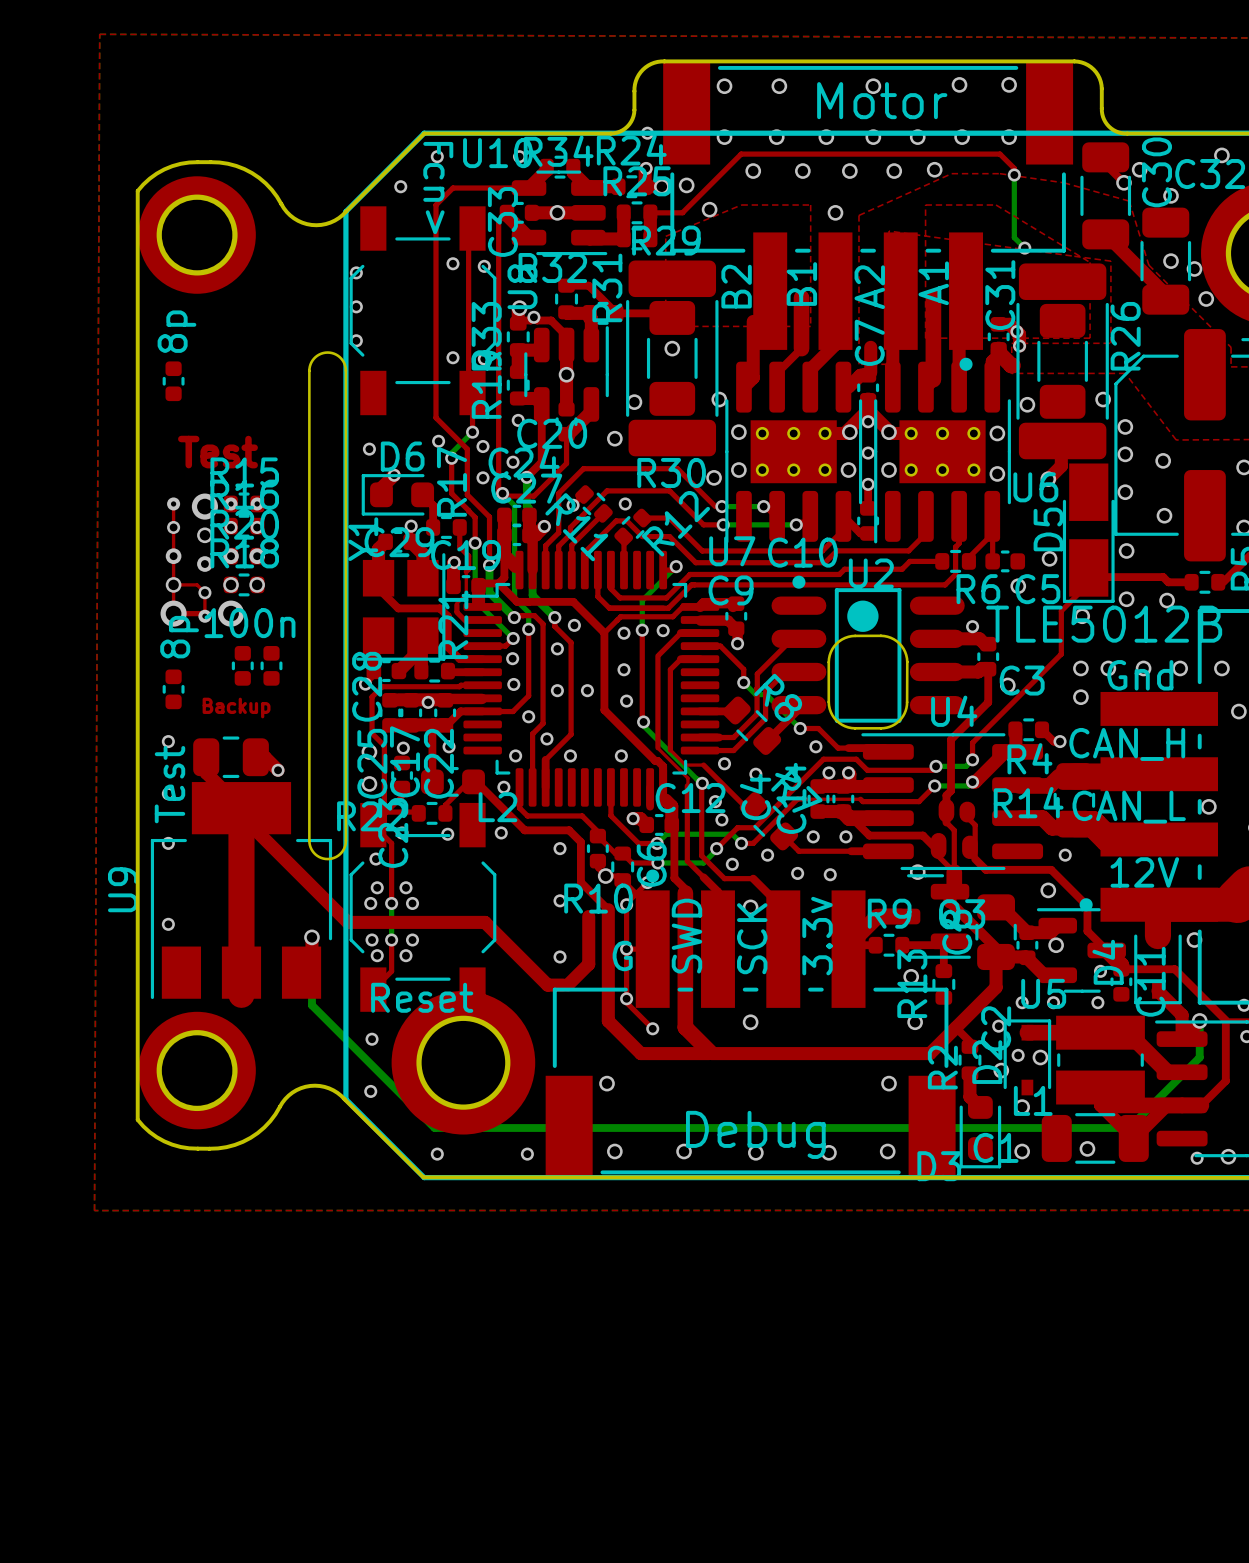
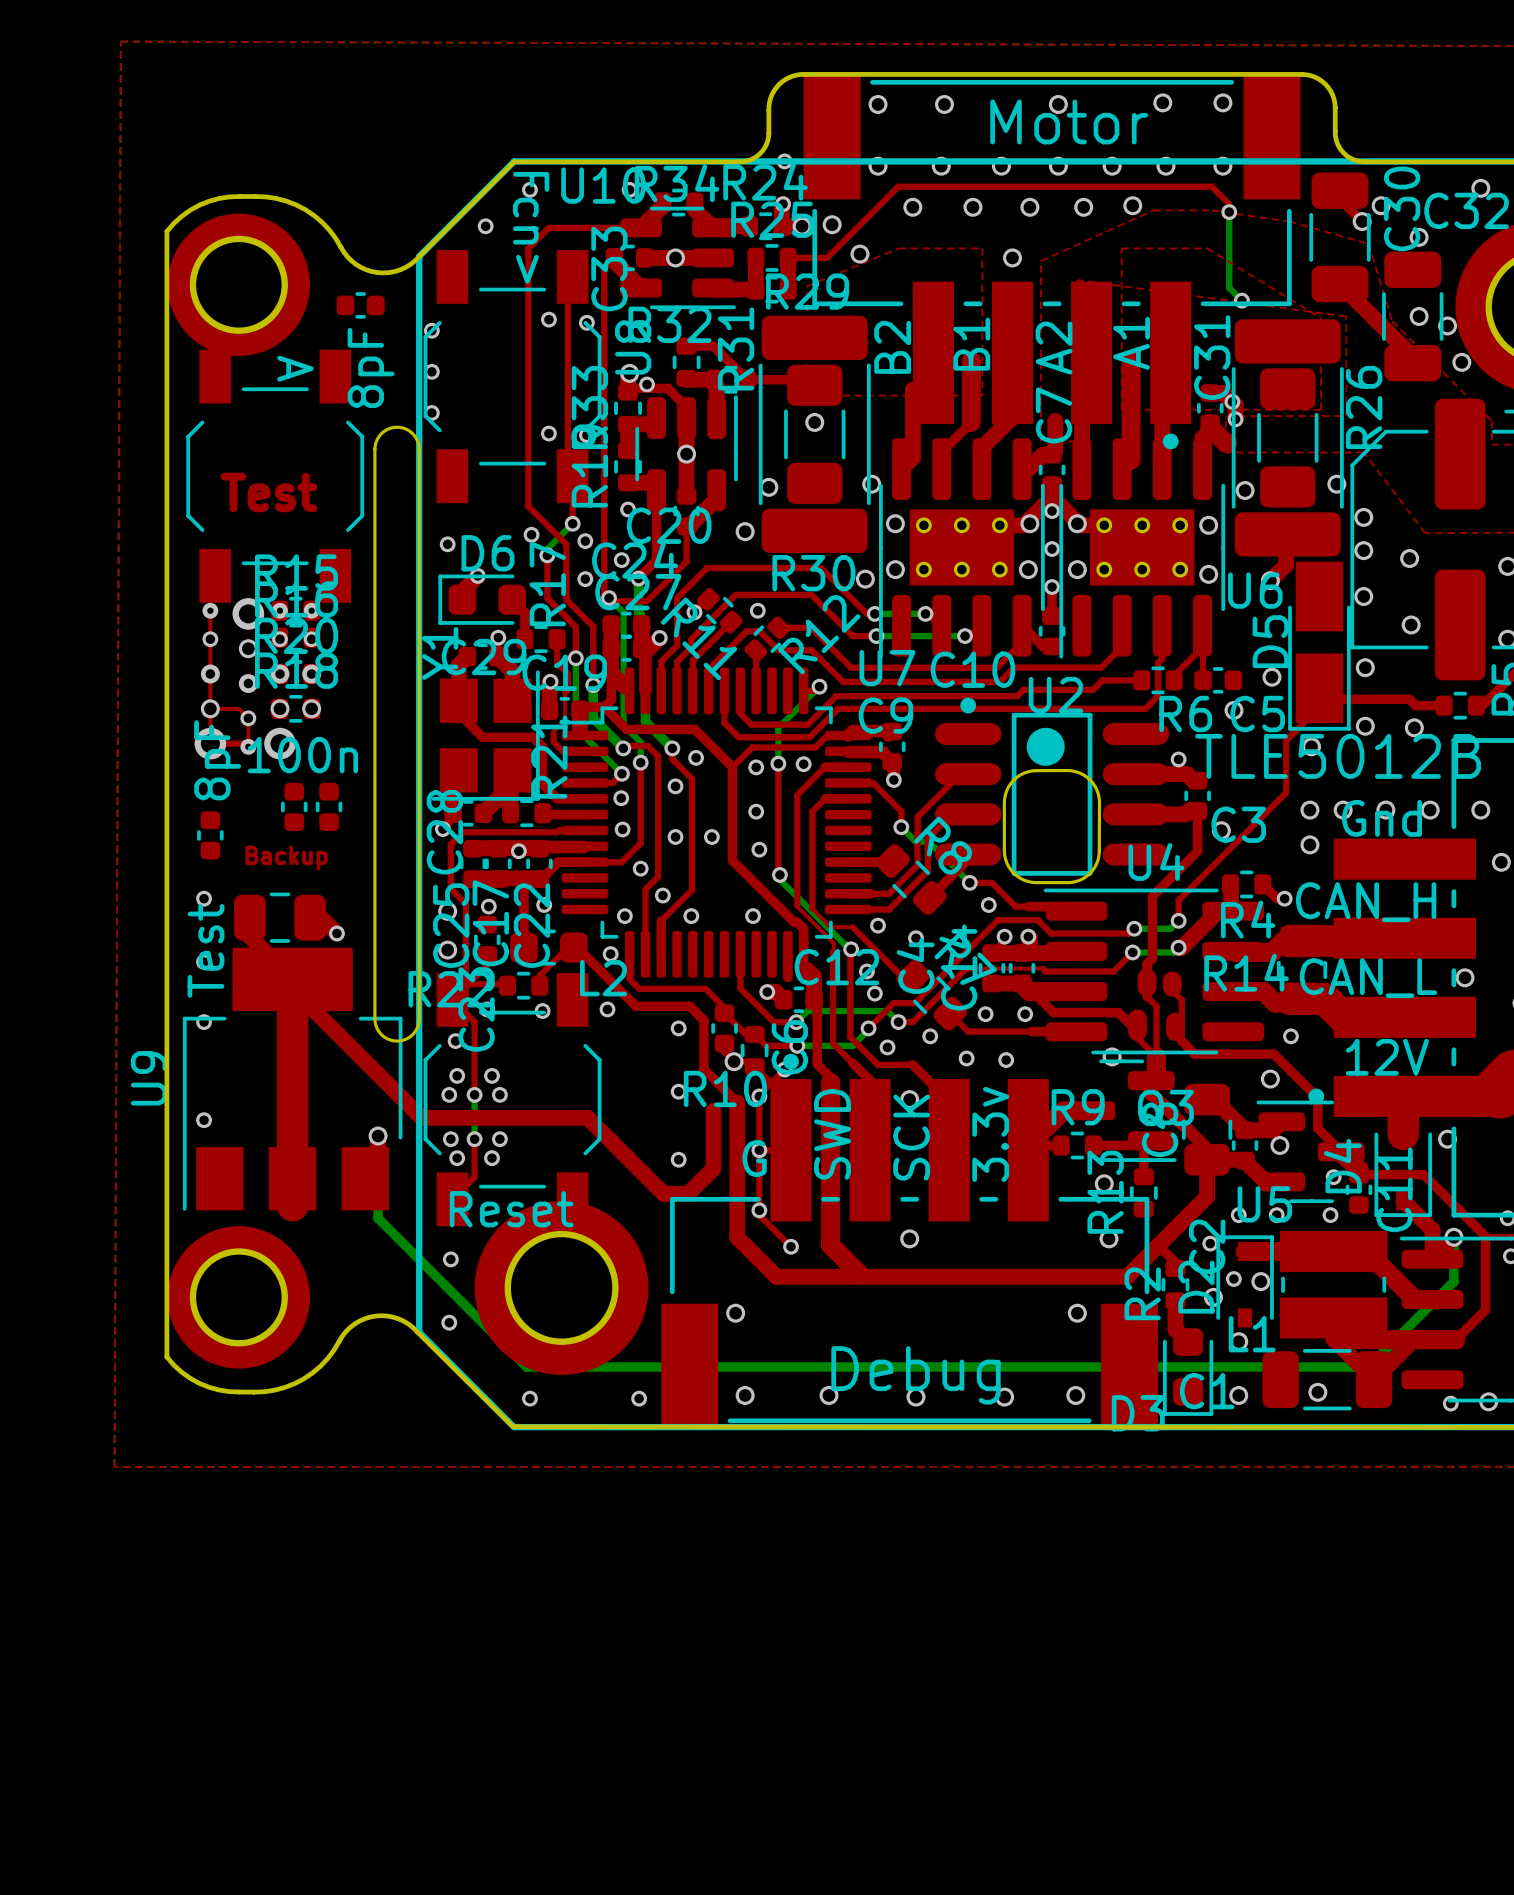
part: none -> 8pF (360, 305)
part: 8p (173, 381) -> none
part: none -> A (275, 476)
text position: Test (217, 452) -> Test (268, 492)
part value: 8p (179, 637) -> 8pF (217, 760)

